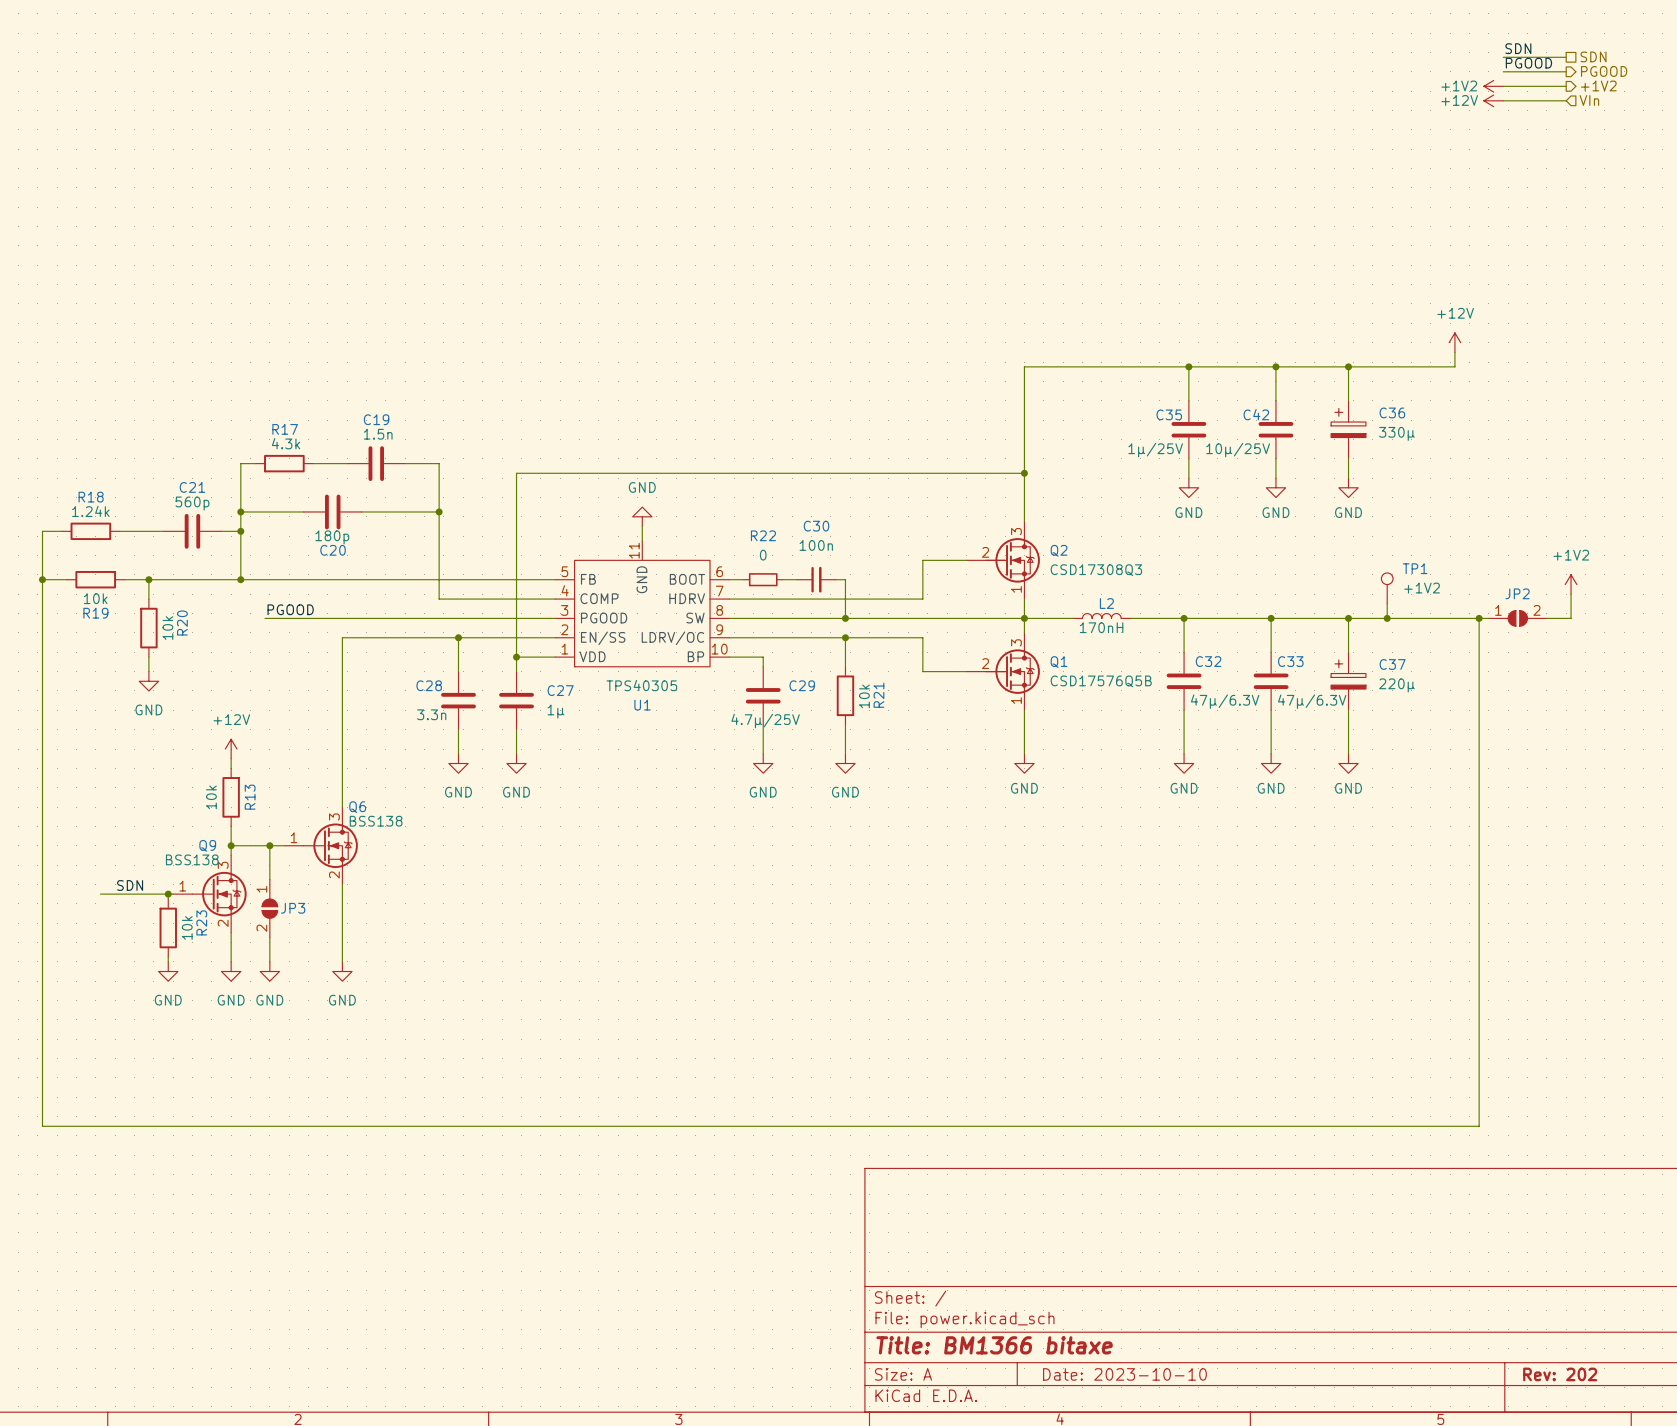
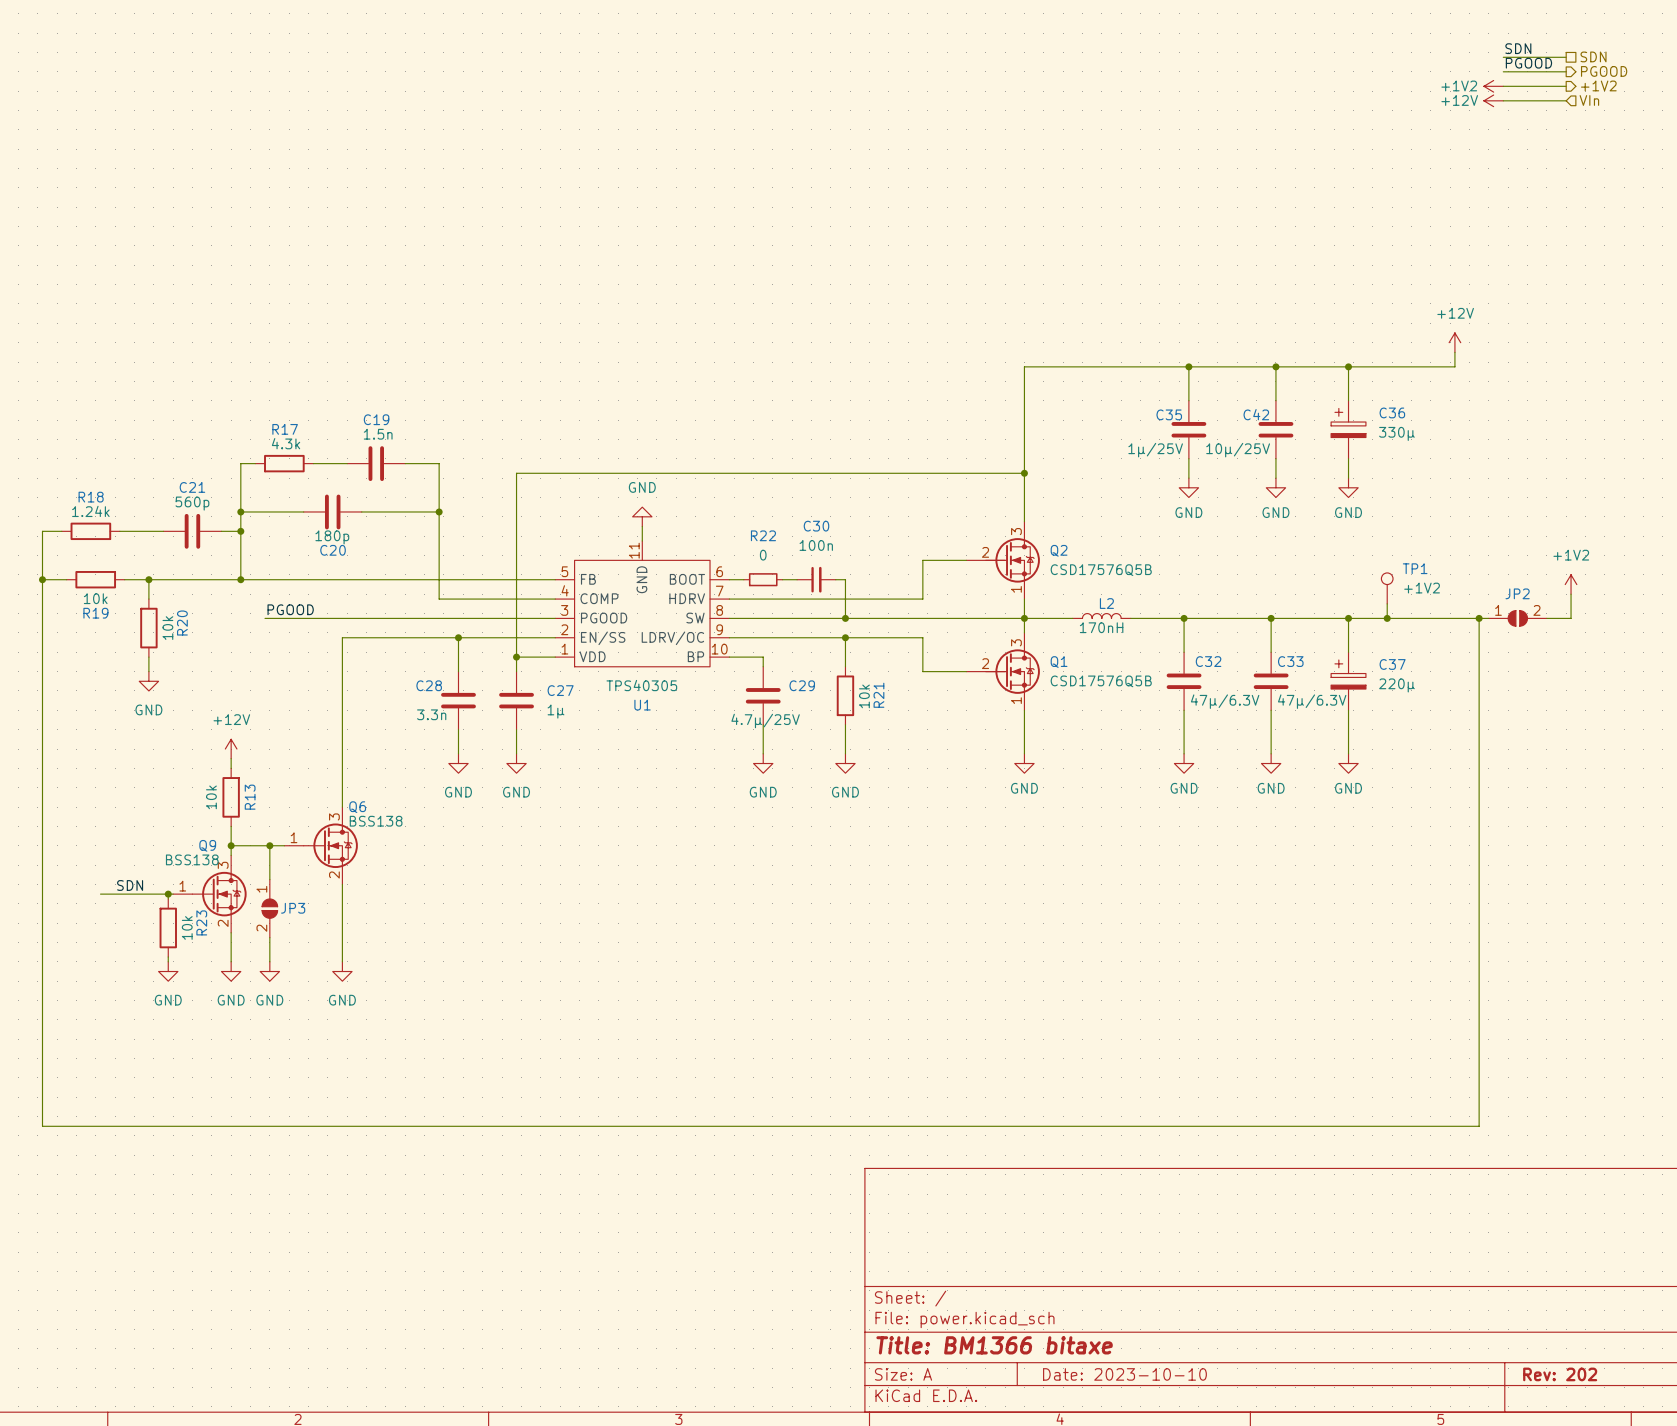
Q2 value: CSD17308Q3 (1096, 570) -> CSD17576Q5B (1101, 570)

